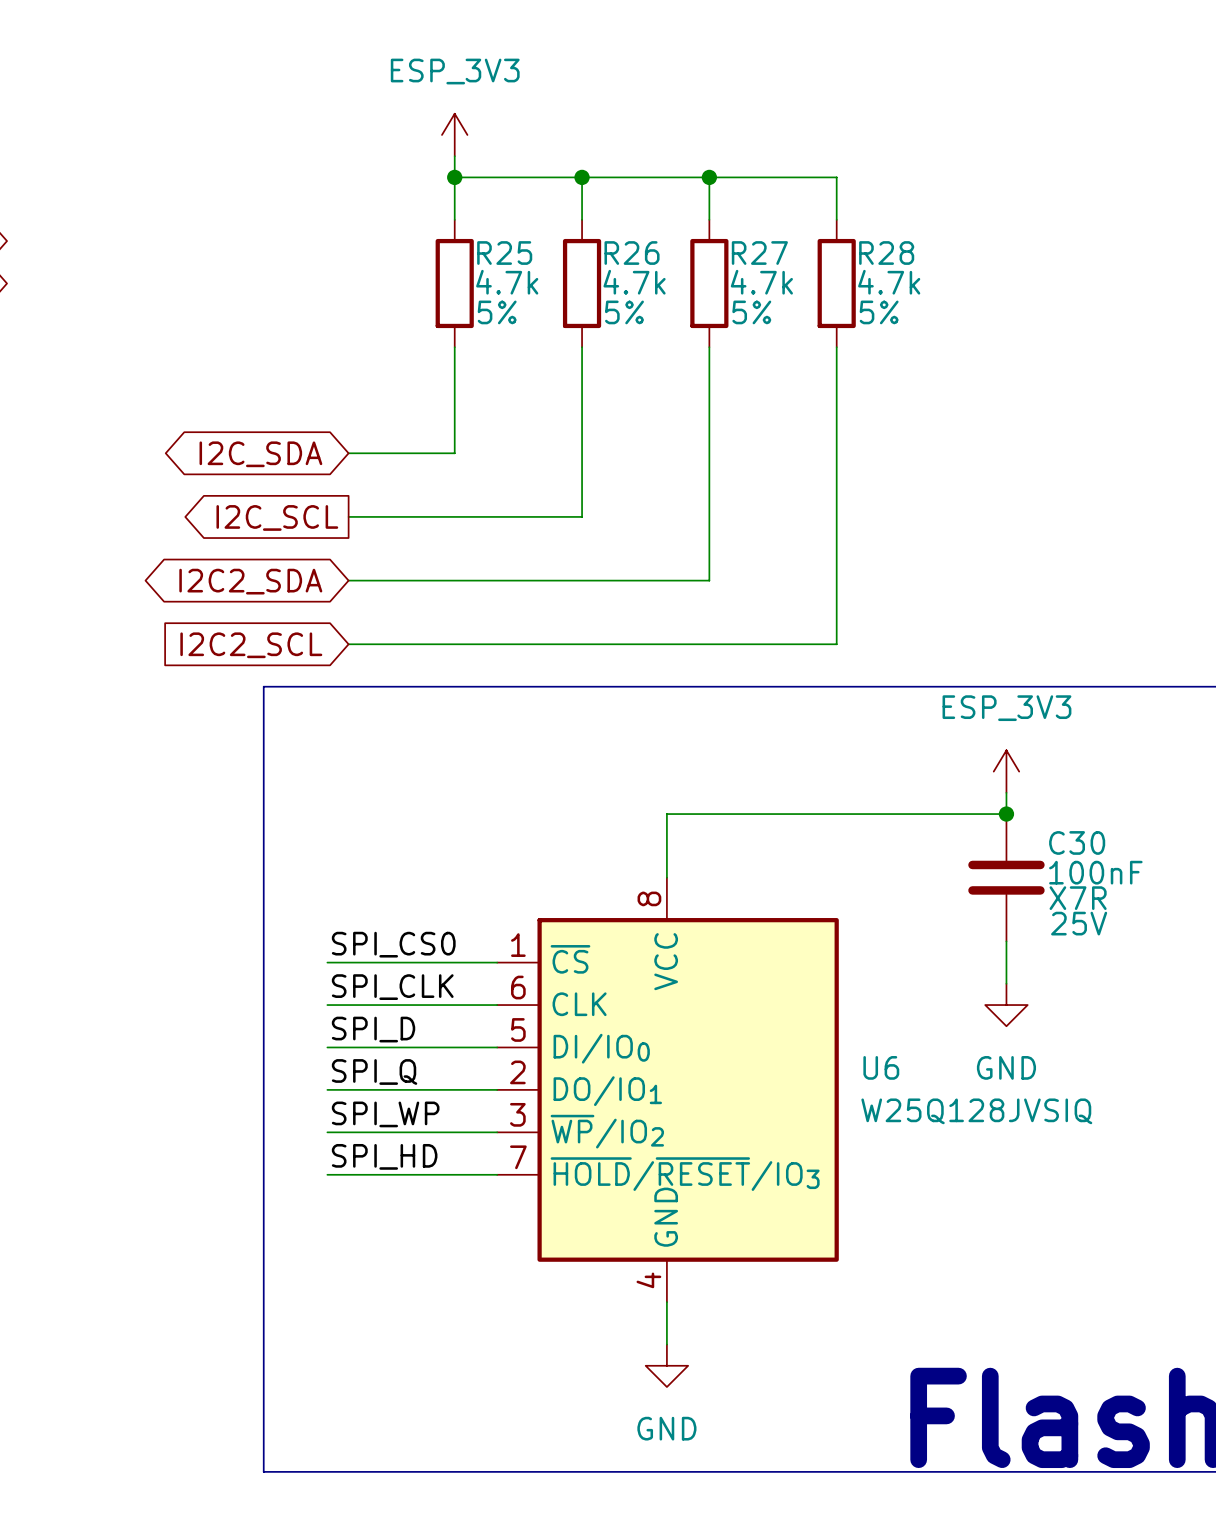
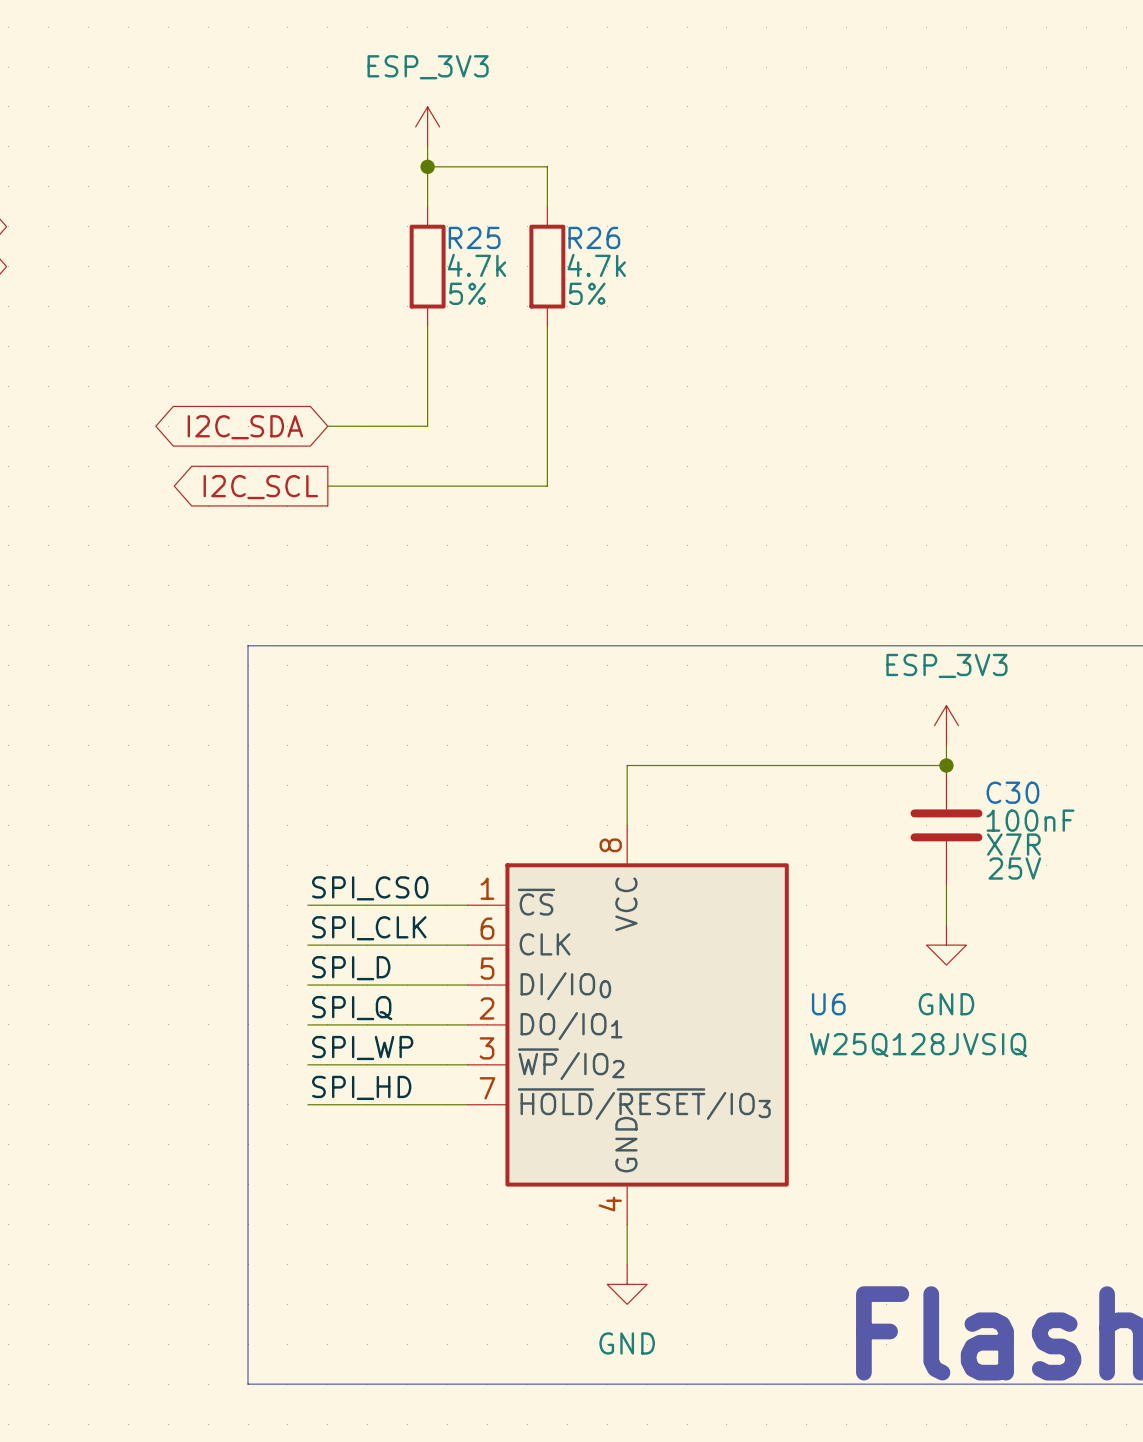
wire: (582, 177) (836, 177) (836, 219) -> none
junction: (582, 177) -> none
wire: (709, 177) (709, 219) -> none
junction: (709, 177) -> none
R27: 4.7k (709, 283) -> none
R28: 4.7k (836, 283) -> none
wire: (709, 347) (709, 580) (348, 580) -> none
wire: (836, 347) (836, 644) (348, 644) -> none
global label: I2C2_SDA (250, 581) -> none
global label: I2C2_SCL (251, 645) -> none

